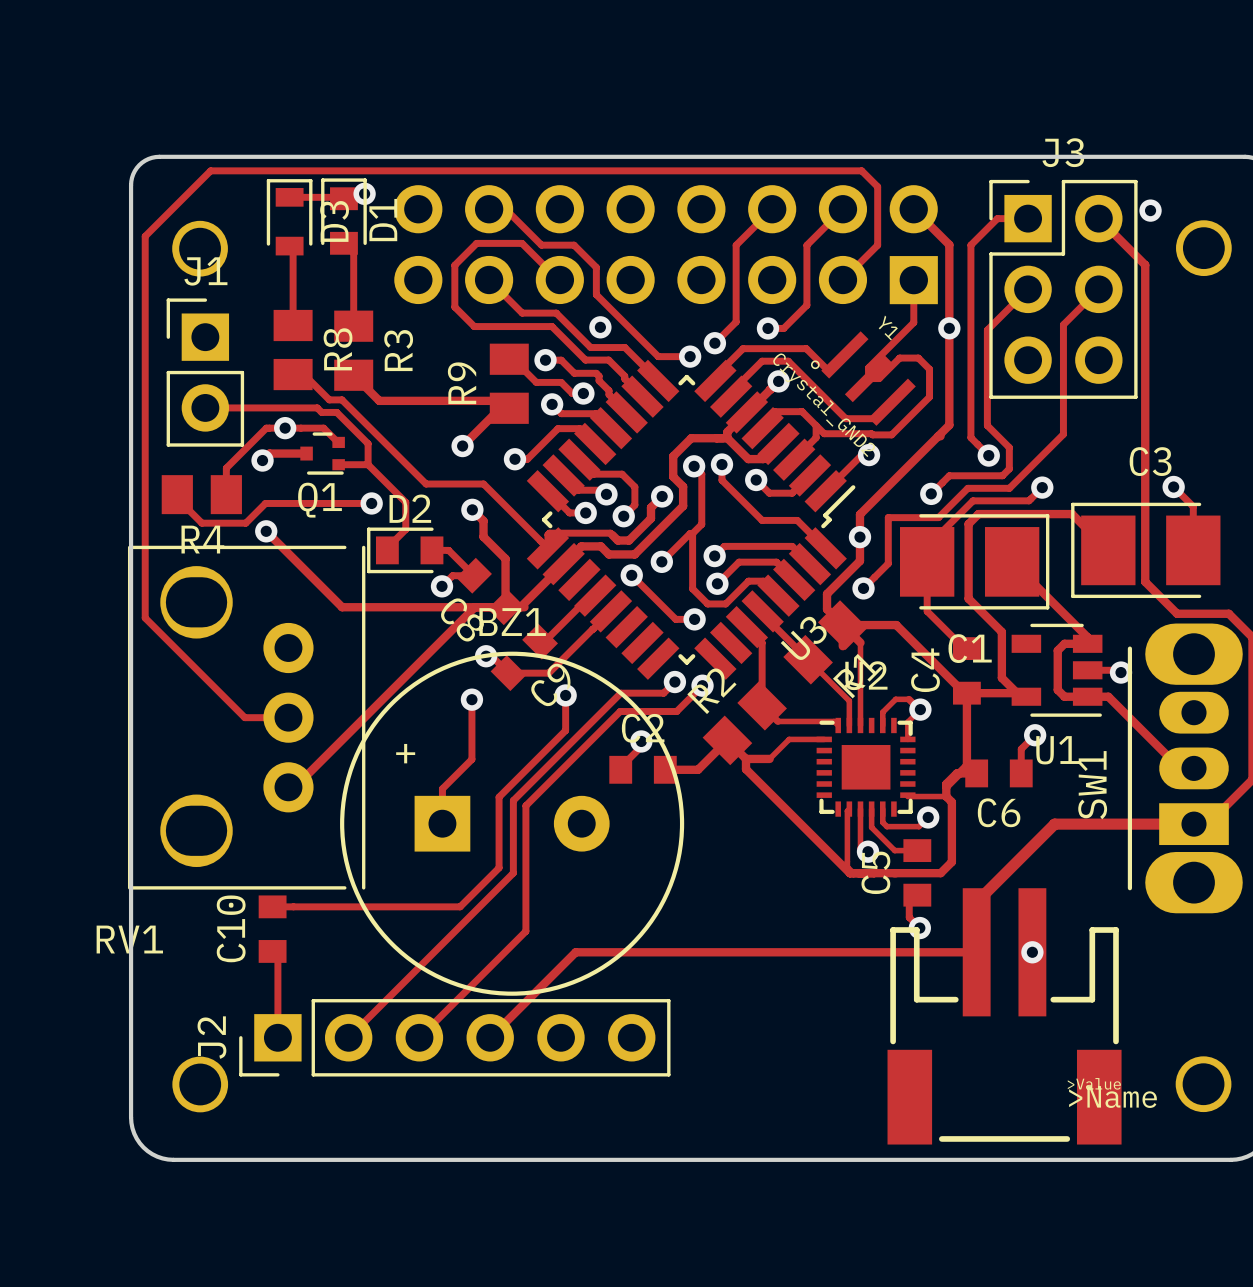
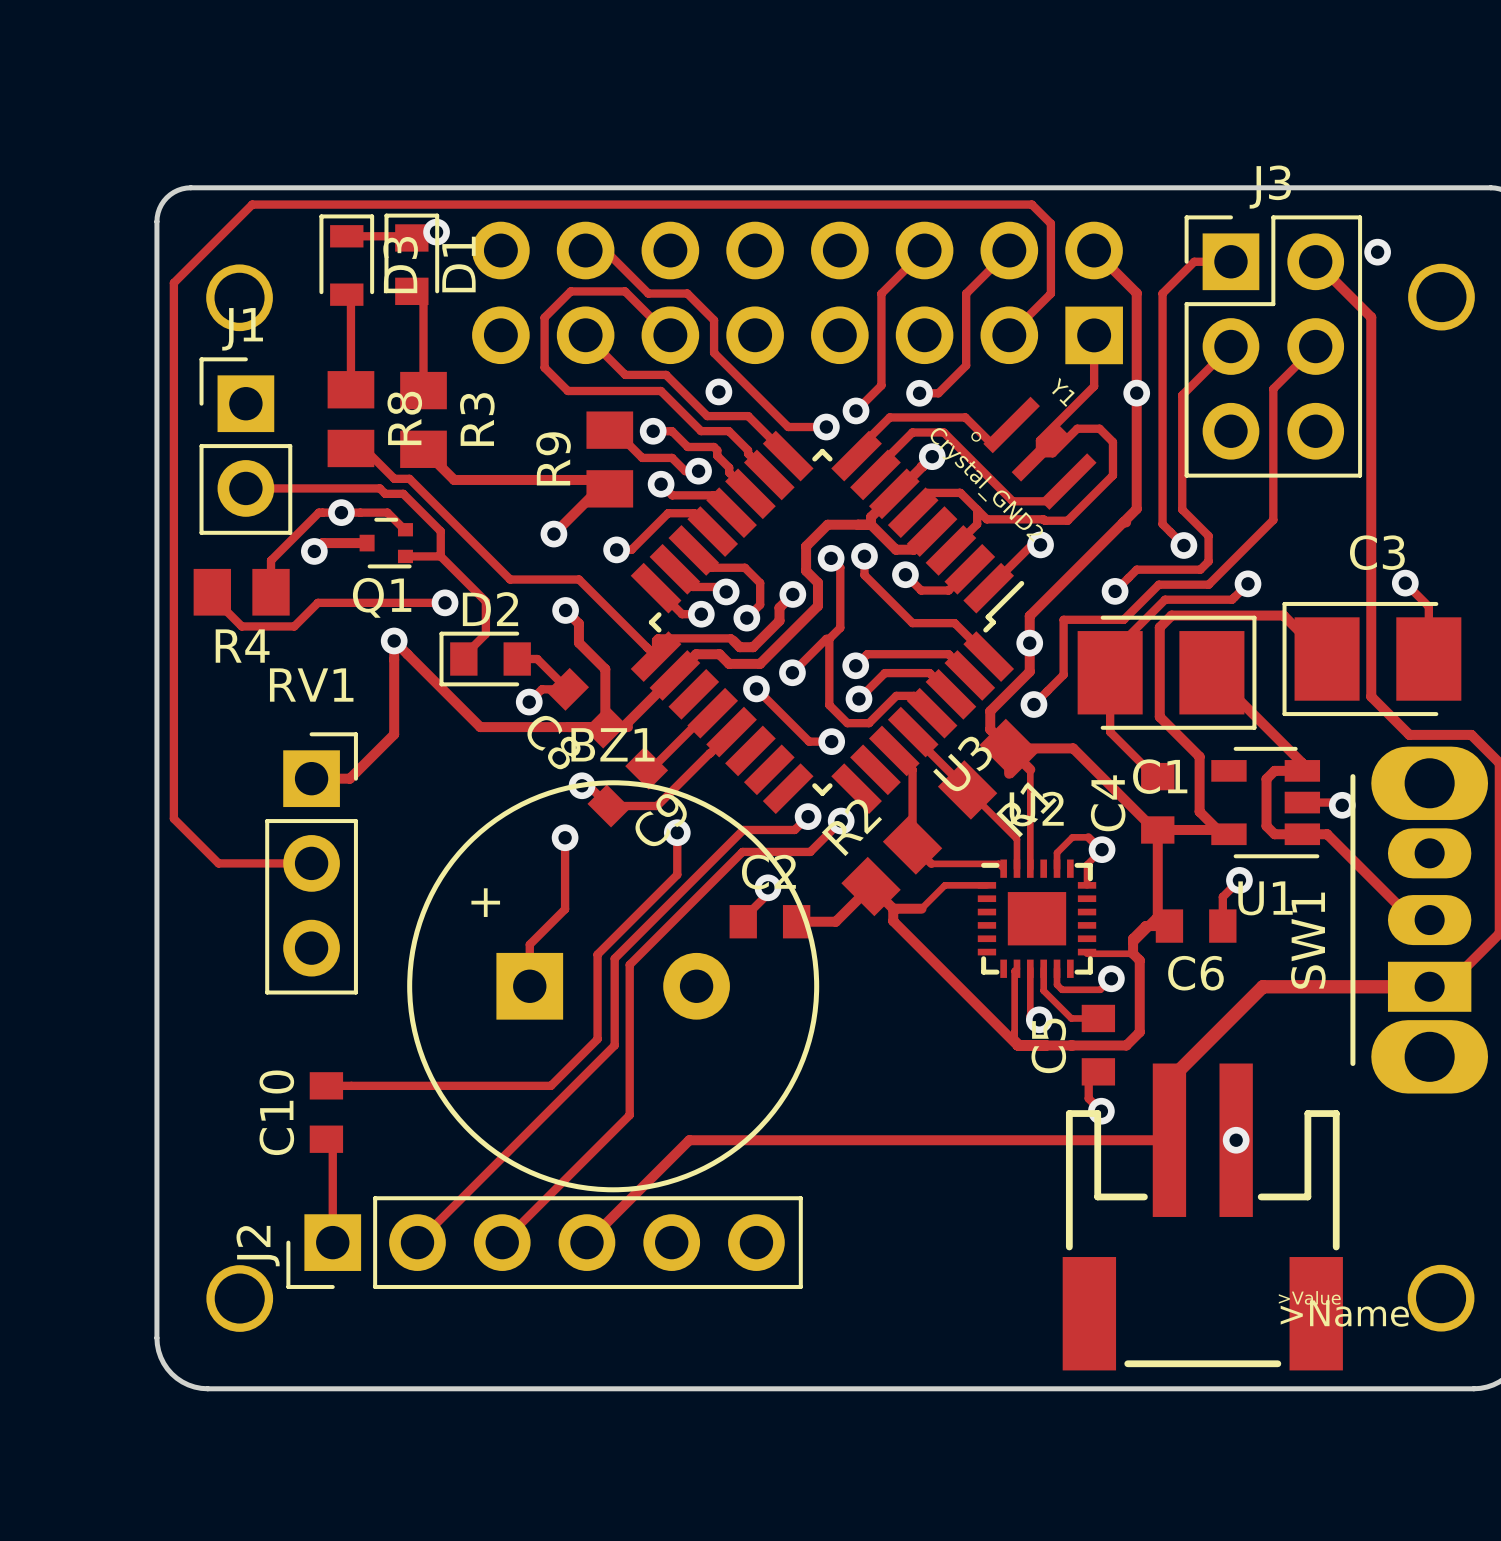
track: (266, 531) (342, 607) (401, 607) -> (311, 778) (349, 778) (394, 734) (394, 640) (480, 727)
via position: (266, 531) -> (394, 640)
RV1 footprint: [127, 545, 366, 890] -> [265, 732, 358, 995]
track: (474, 607) (294, 787) (288, 787) -> none
track: (145, 618) (244, 717) (288, 717) -> (173, 739) (173, 818) (218, 863) (311, 863)
RV1 name position: RV1 (129, 939) -> RV1 (311, 685)

